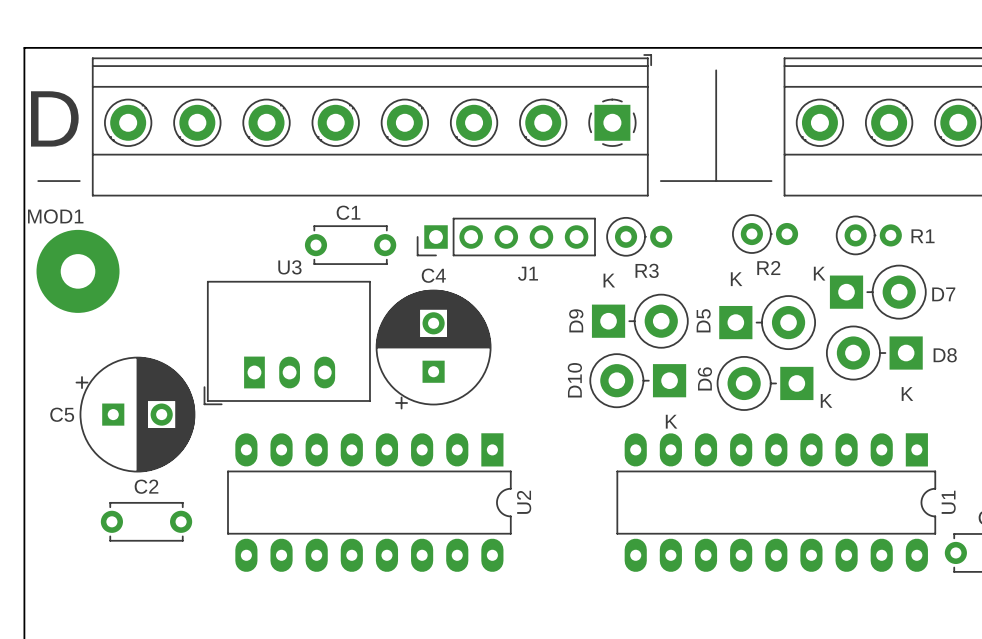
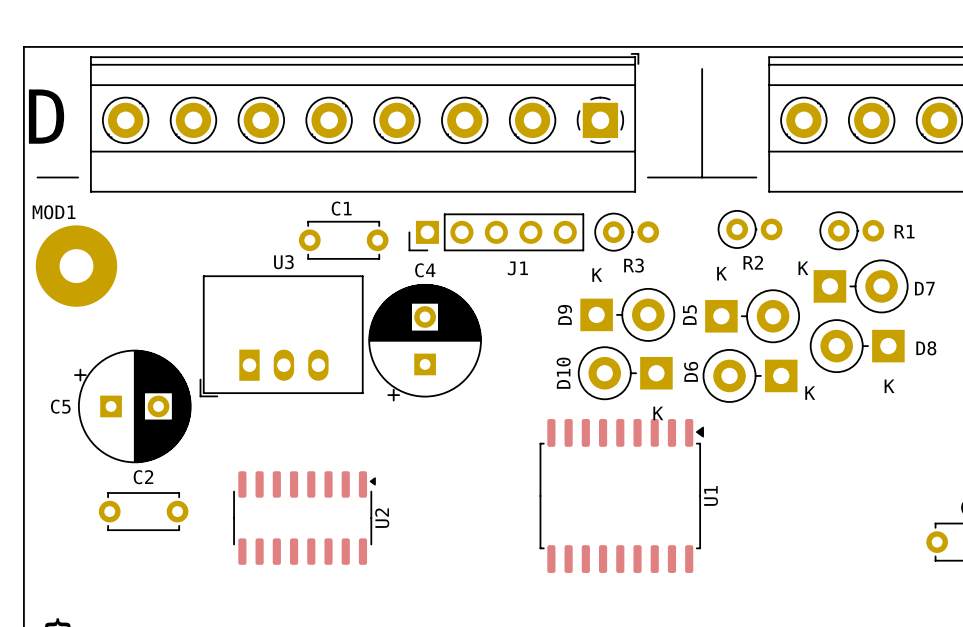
U2 footprint: [227, 433, 512, 572] -> [233, 471, 376, 565]
U1 footprint: [616, 433, 937, 572] -> [539, 419, 704, 573]
U2 name position: U2 (524, 502) -> U2 (382, 518)
U1 name position: U1 (948, 502) -> U1 (711, 495)

